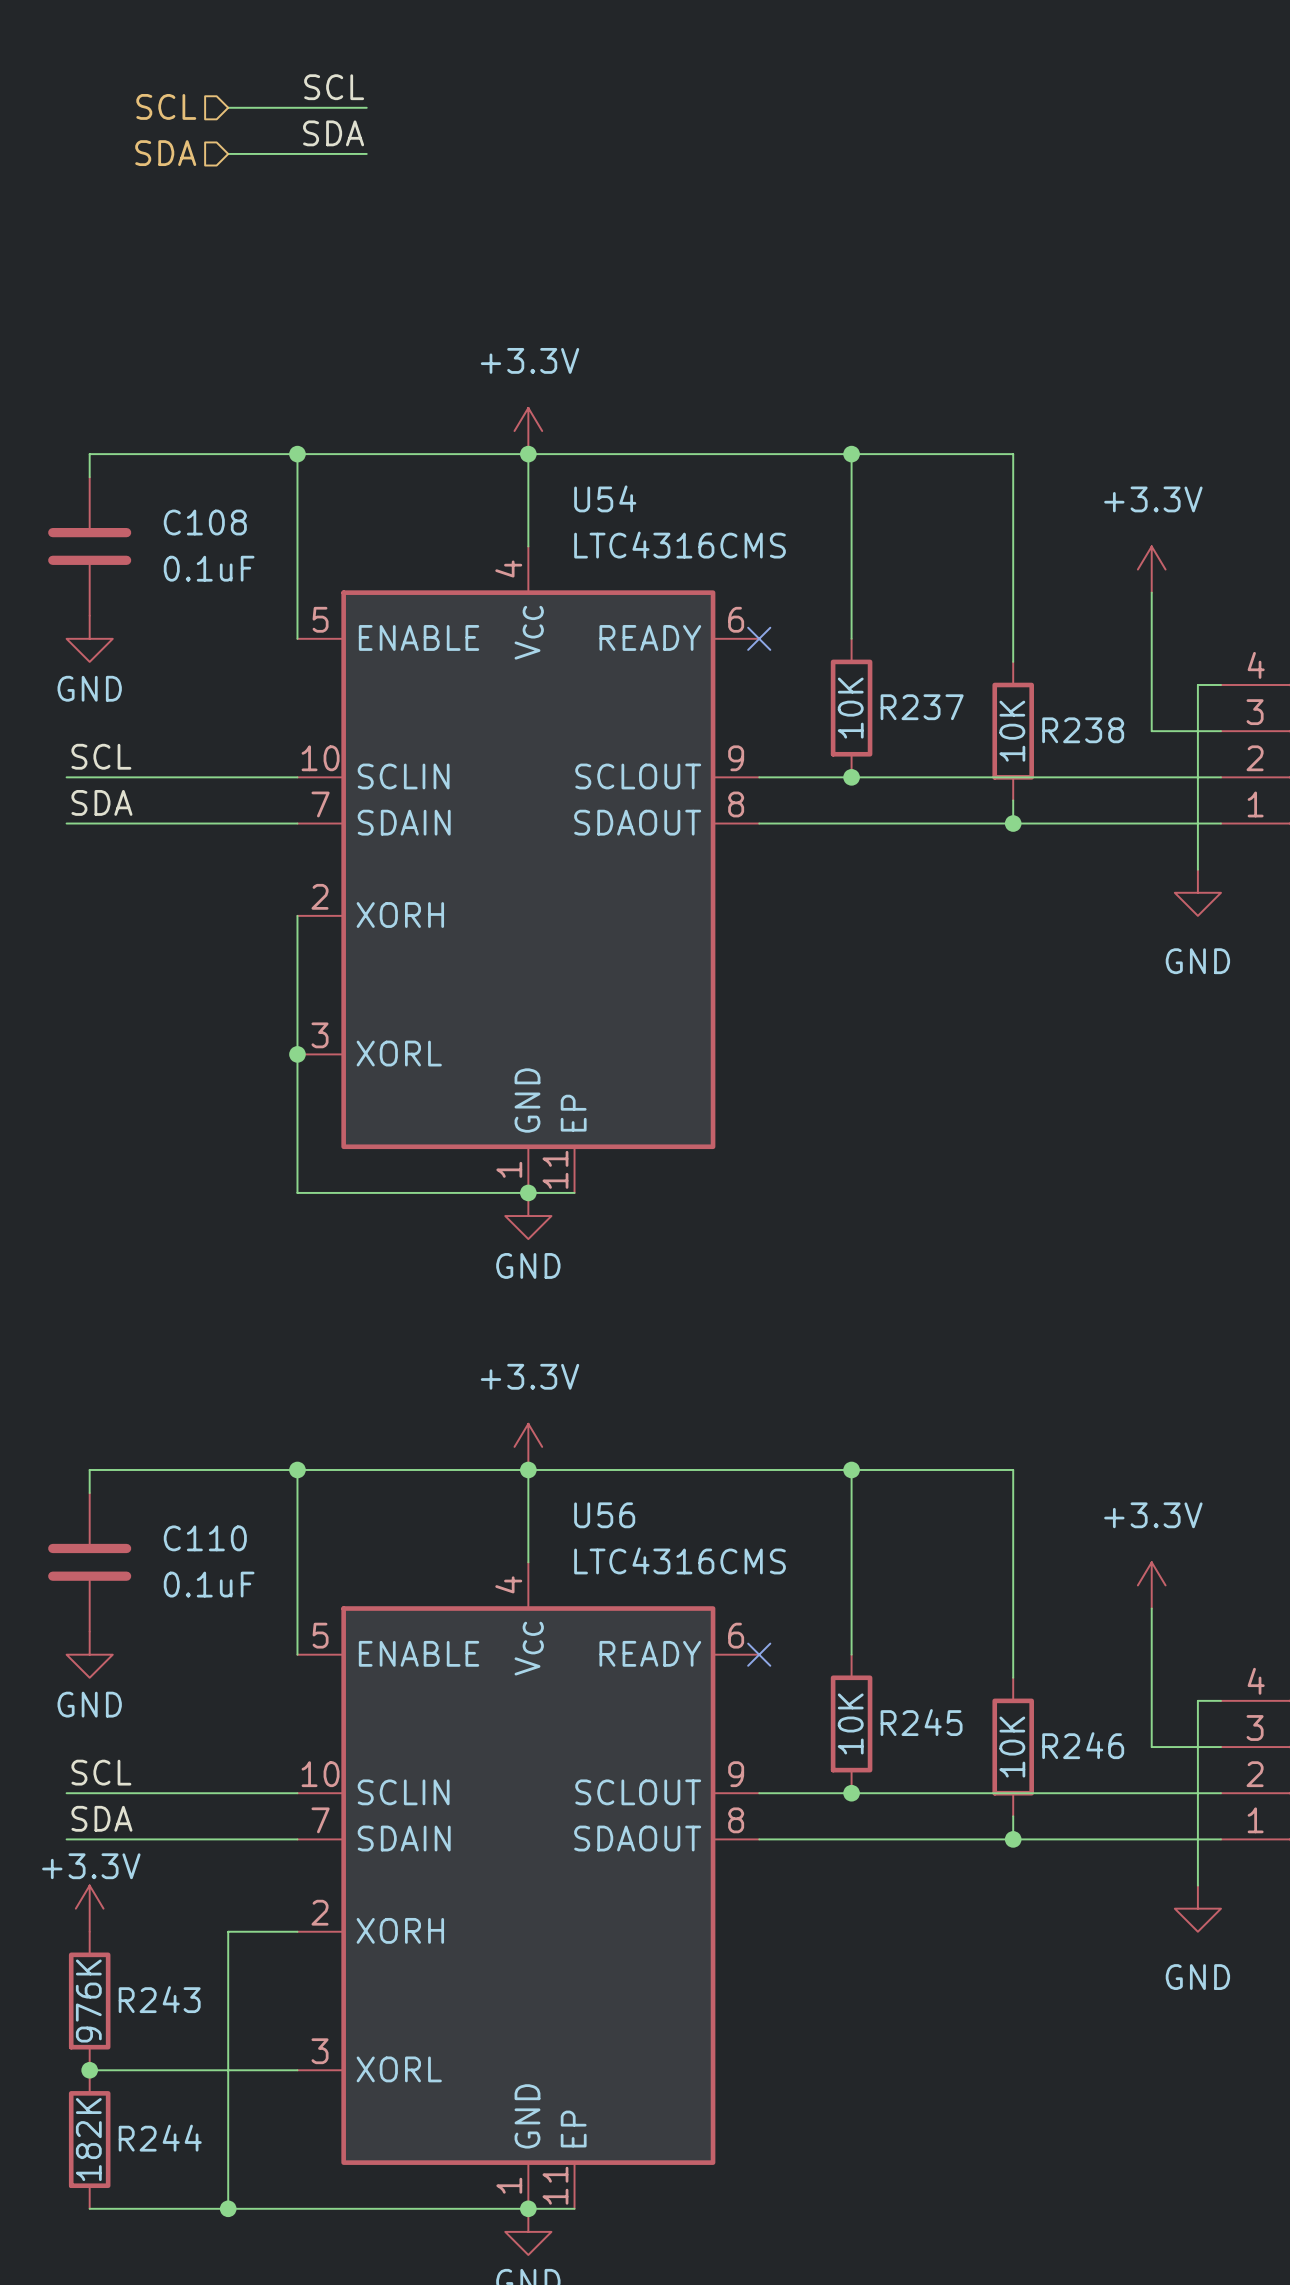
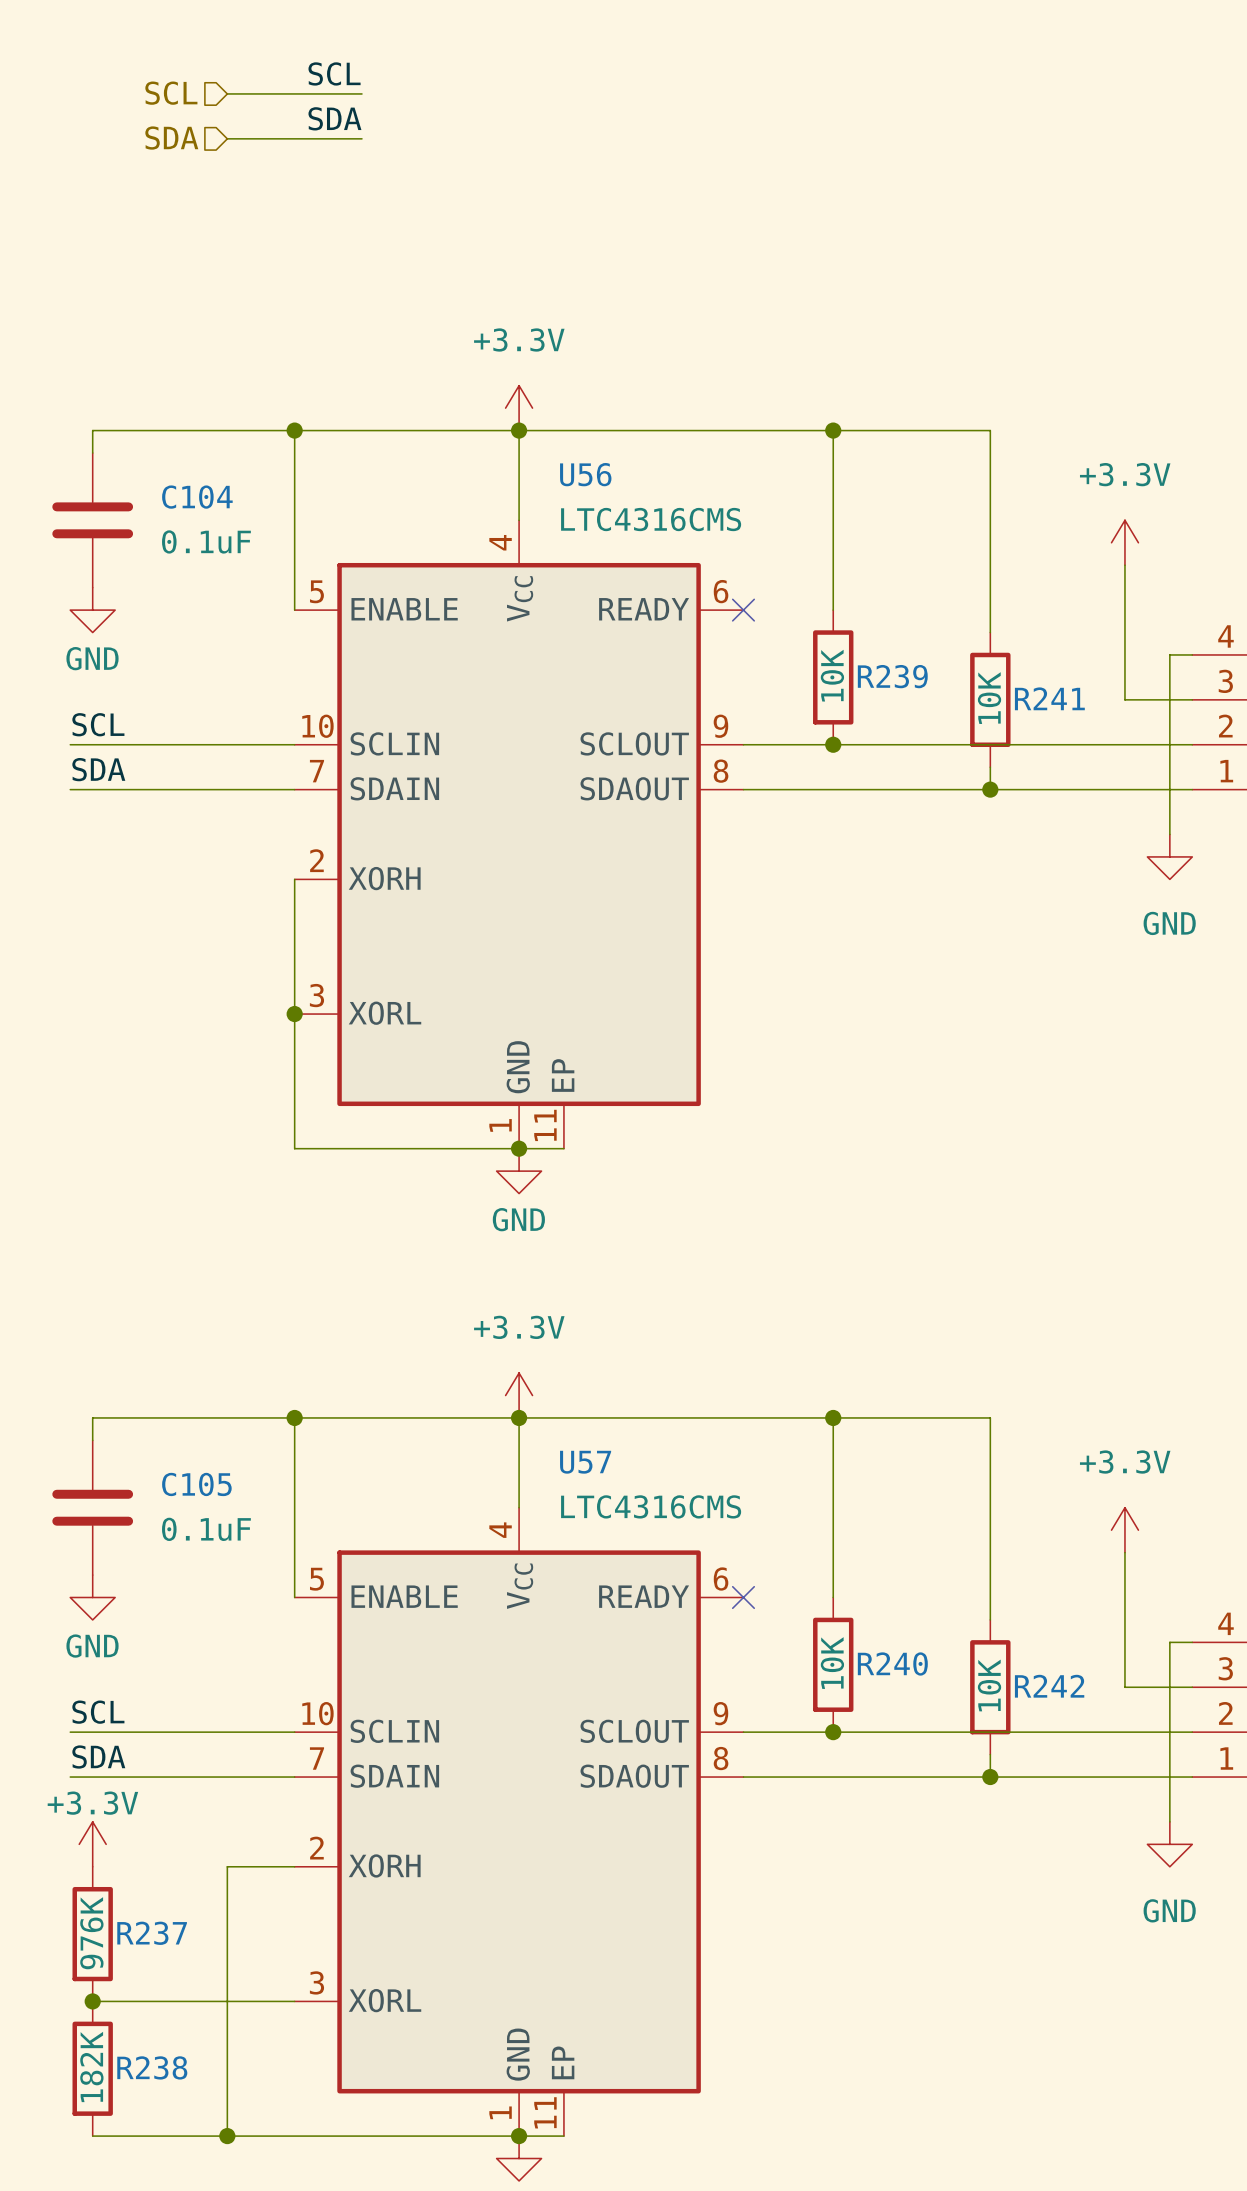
U54 name: U54 (605, 498) -> U56 (585, 474)
C108 name: C108 (205, 522) -> C104 (197, 497)
R237 name: R237 (922, 707) -> R239 (892, 676)
R238 name: R238 (1083, 730) -> R241 (1049, 698)
U56 name: U56 (604, 1515) -> U57 (585, 1462)
C110 name: C110 (205, 1538) -> C105 (196, 1484)
R245 name: R245 (921, 1722) -> R240 (892, 1664)
R246 name: R246 (1083, 1745) -> R242 (1049, 1686)
R243 name: R243 (159, 1999) -> R237 (152, 1933)
R244 name: R244 (160, 2138) -> R238 (152, 2067)

